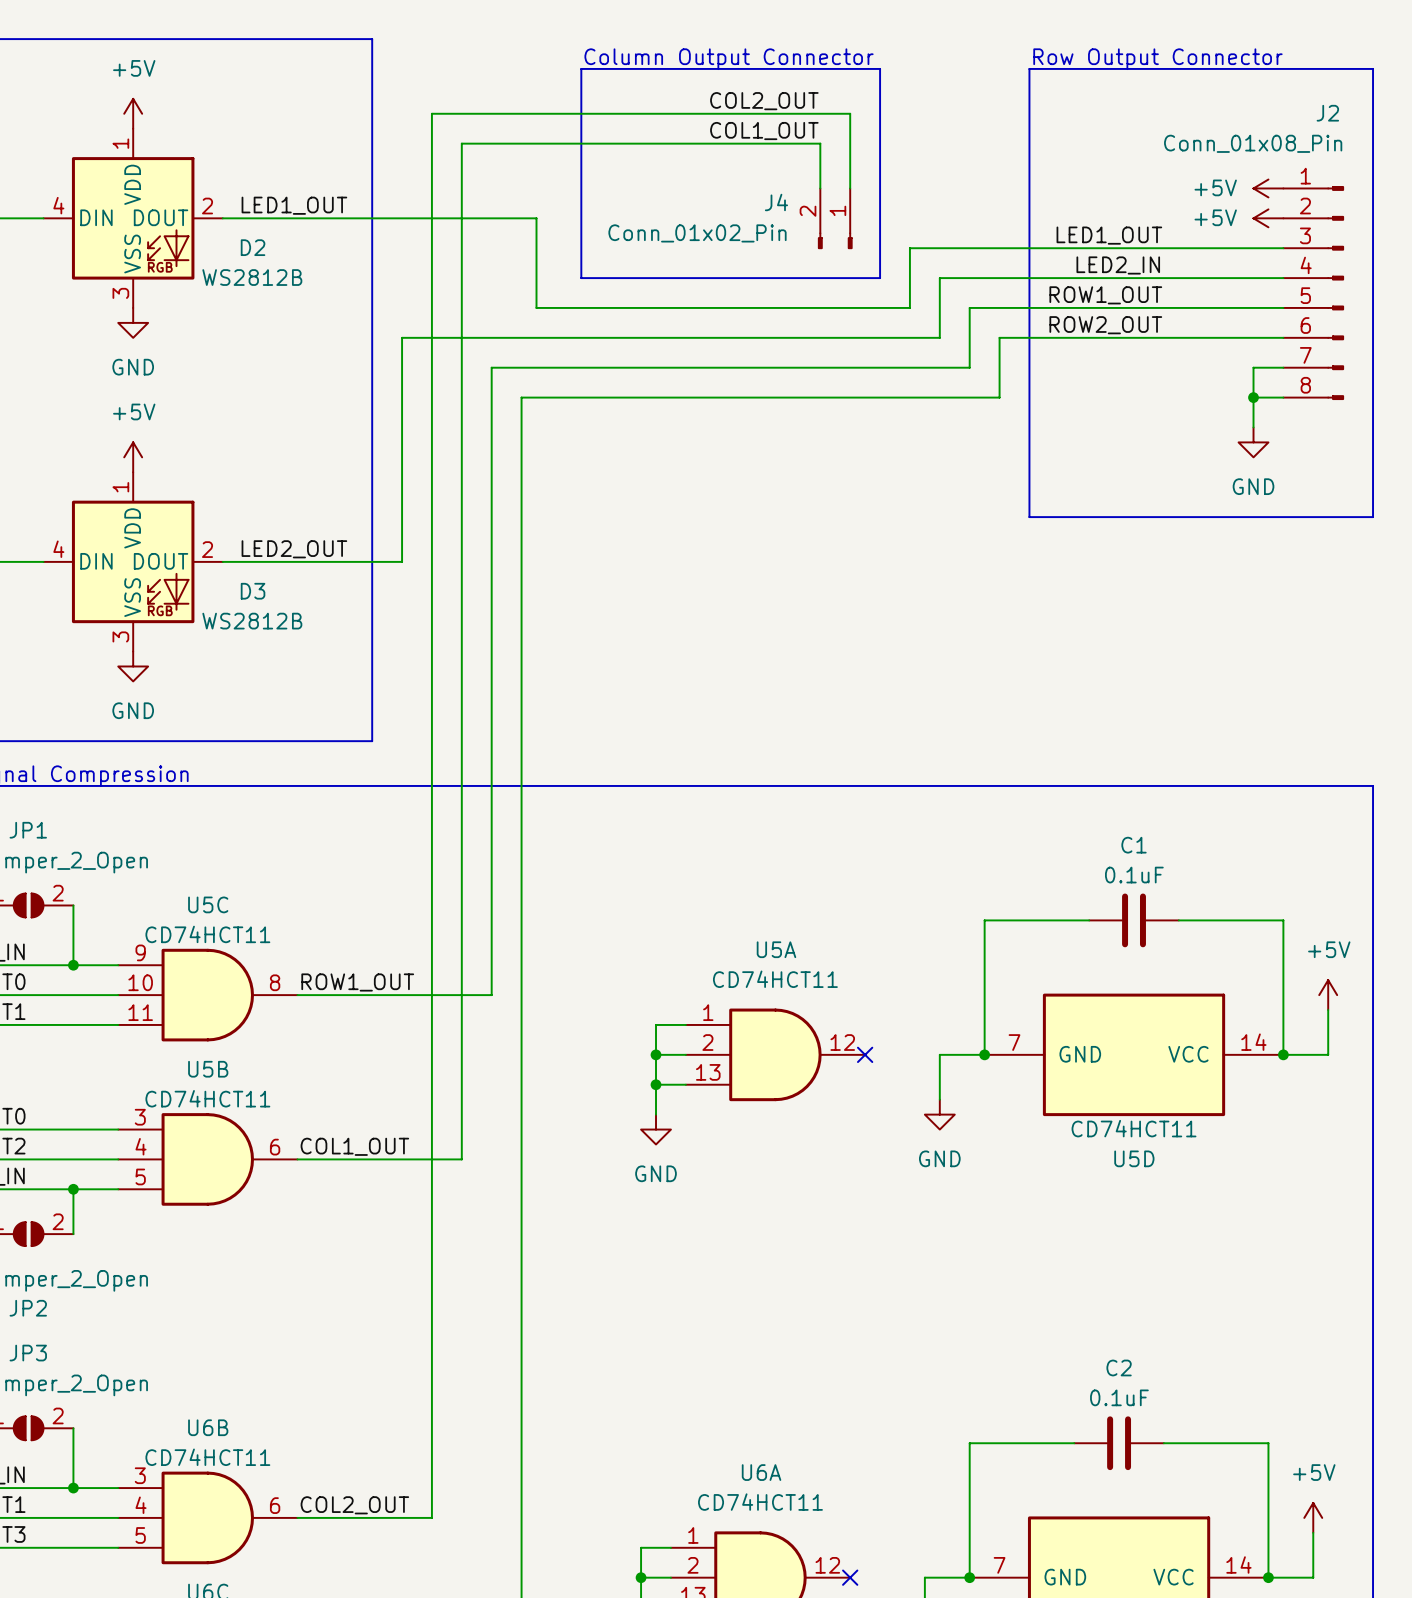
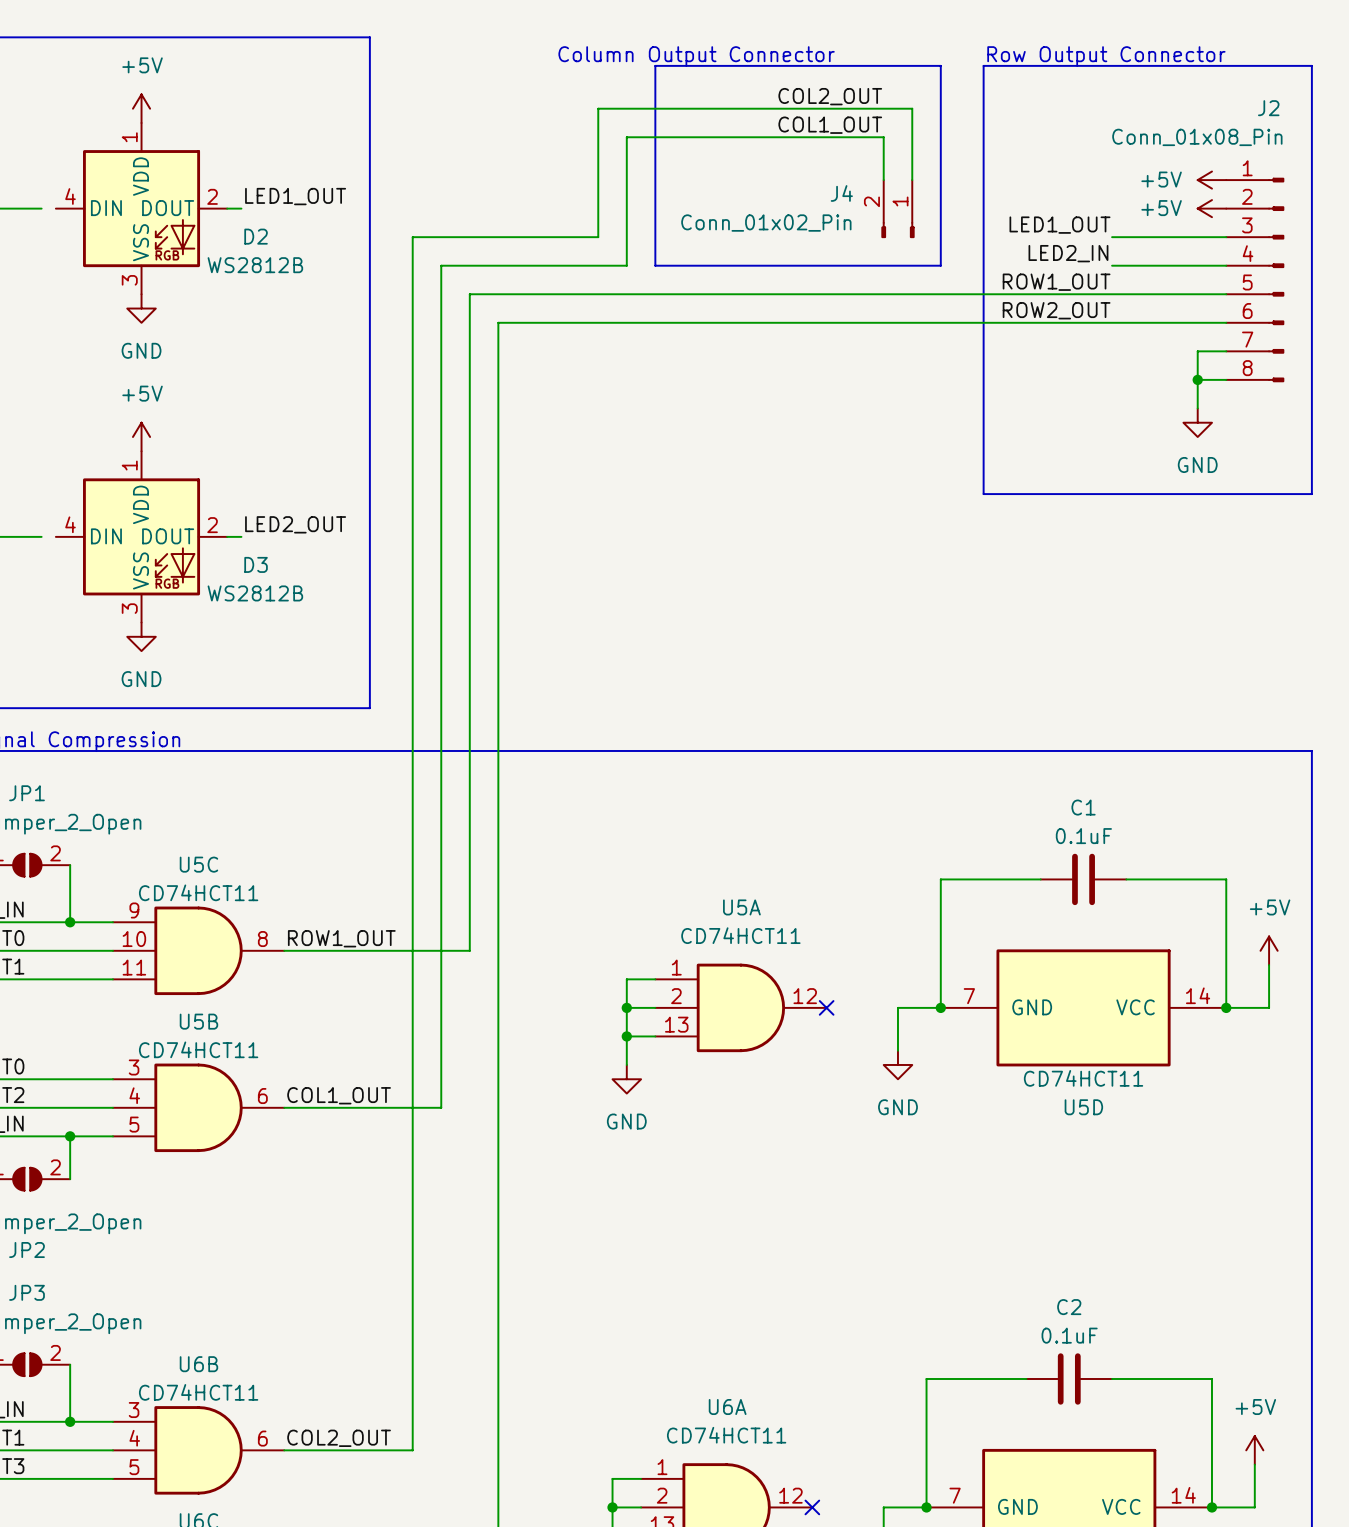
line: (372, 39) (372, 741) -> (355, 37) (369, 37) (369, 708) (355, 708)
line: (685, 68) (581, 68) (581, 278) (685, 278) -> (655, 65) (655, 265)
line: (880, 68) (880, 278) -> (840, 65) (940, 65) (940, 265) (840, 265)
label position: COL2_OUT (764, 101) -> COL2_OUT (830, 96)
power symbol position: +5V (133, 113) -> +5V (141, 108)
wire: (626, 113) (431, 113) (431, 248) -> (598, 108) (598, 237) (412, 237)
wire: (850, 113) (850, 188) -> (812, 108) (912, 108) (912, 180)
label position: COL1_OUT (764, 131) -> COL1_OUT (830, 125)
wire: (656, 143) (461, 143) (461, 278) -> (626, 137) (626, 265) (441, 265)
wire: (820, 143) (820, 188) -> (783, 137) (883, 137) (883, 180)
label position: LED1_OUT (294, 205) -> LED1_OUT (295, 196)
D2 position: (133, 218) -> (141, 208)
wire: (252, 218) (536, 218) (536, 307) -> (469, 351) (469, 294) (512, 294)
J4 position: (835, 218) -> (897, 209)
wire: (1163, 248) (909, 248) (909, 307) -> (926, 294) (869, 294)
wire: (1163, 278) (939, 278) (939, 337) -> (955, 322) (897, 322)
wire: (969, 307) (969, 367) (491, 367) -> none
power symbol position: GND (133, 322) -> GND (141, 308)
wire: (521, 337) (402, 337) (402, 561) (252, 561) -> (498, 322) (498, 379)
wire: (999, 337) (999, 397) (521, 397) -> none
power symbol position: +5V (133, 457) -> +5V (141, 436)
label position: LED2_OUT (294, 549) -> LED2_OUT (295, 524)
D3 position: (133, 561) -> (141, 536)
power symbol position: GND (133, 666) -> GND (141, 636)

